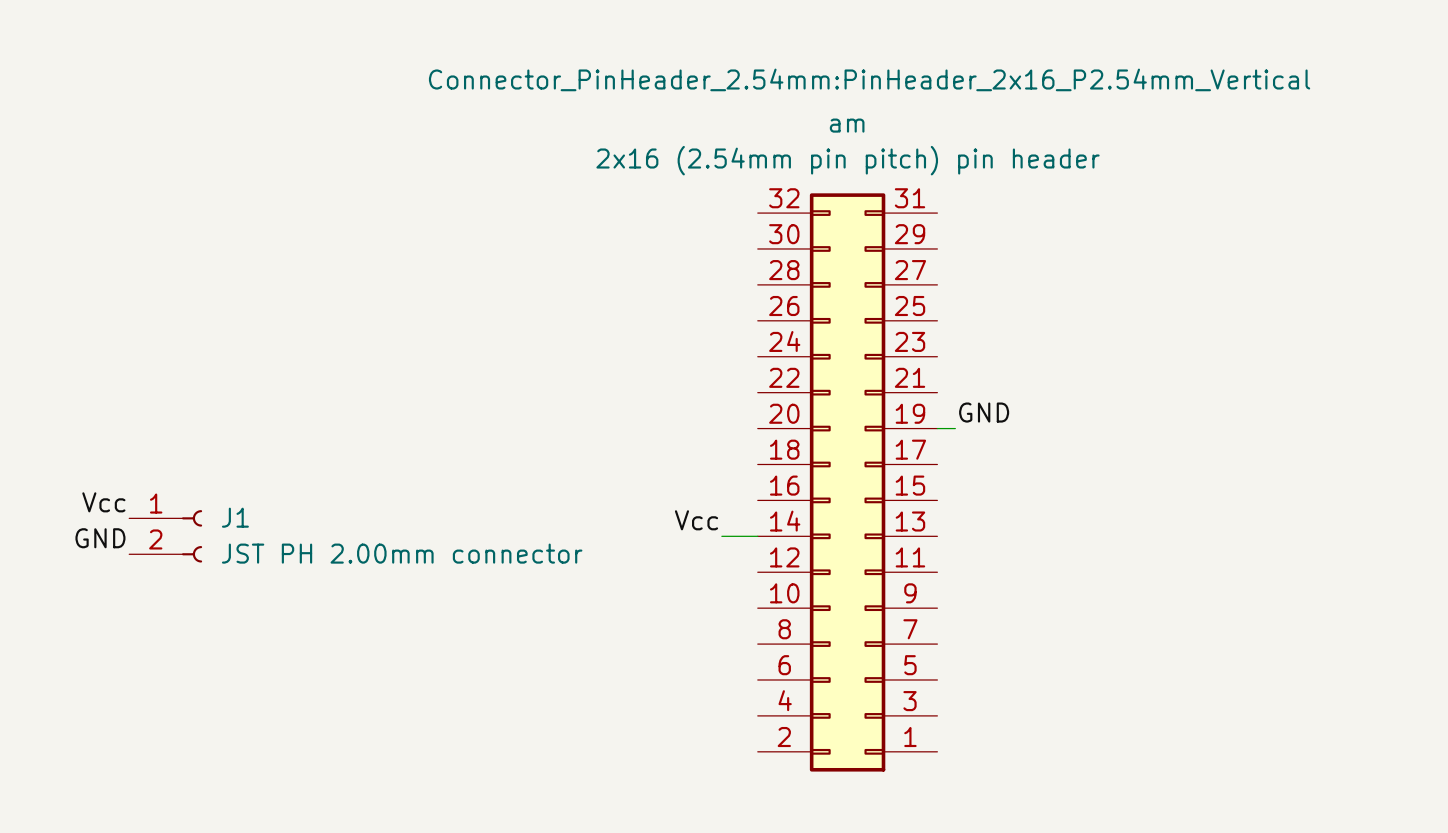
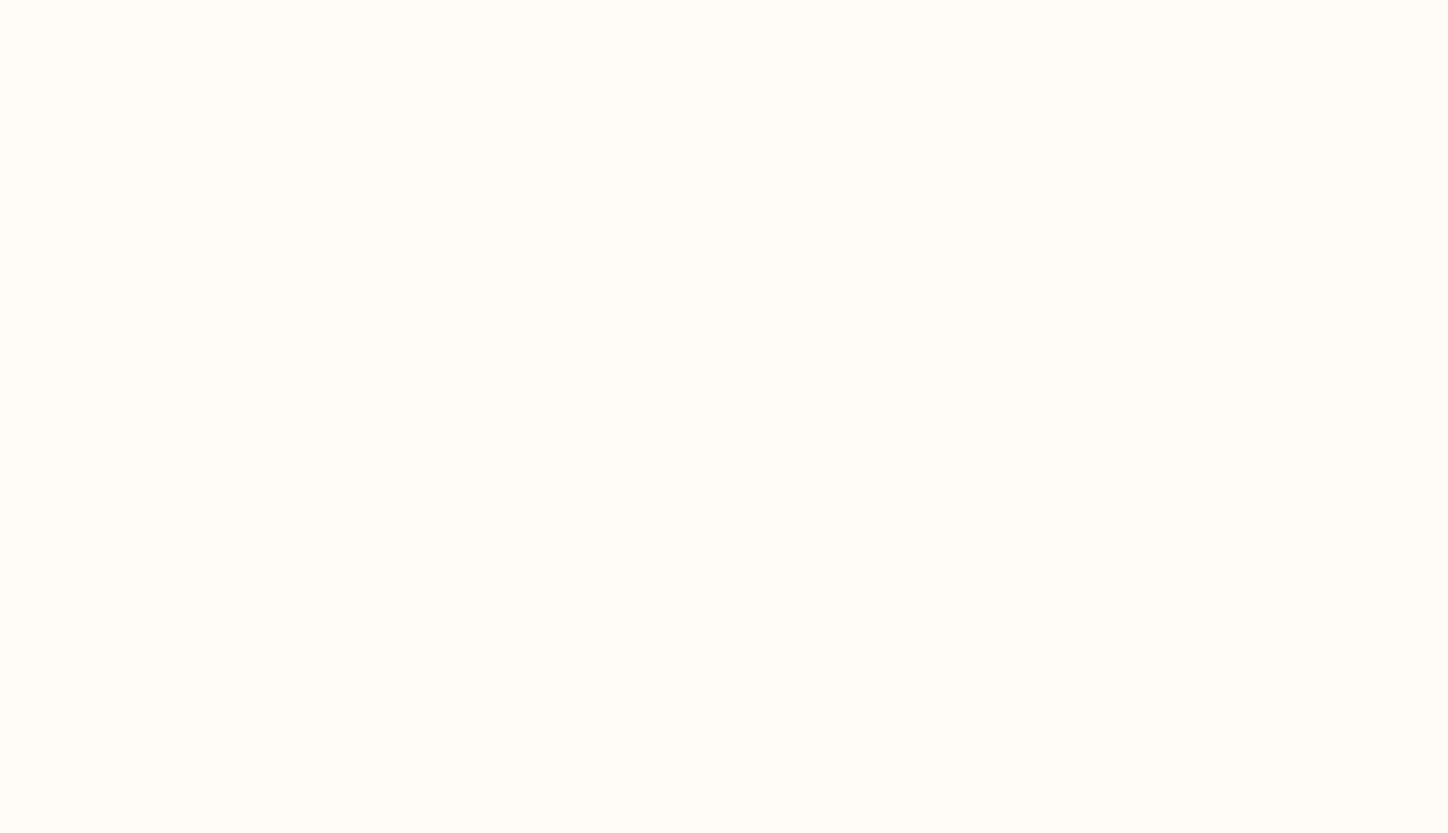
label: GND (984, 412) -> none
wire: (937, 428) (955, 428) -> none
am: 2x16 (2.54mm pin pitch) pin header (847, 482) -> none
label: Vcc (103, 502) -> none
label: Vcc (696, 520) -> none
J1: JST PH 2.00mm connector (165, 536) -> none
wire: (721, 536) (757, 536) -> none
label: GND (100, 538) -> none

